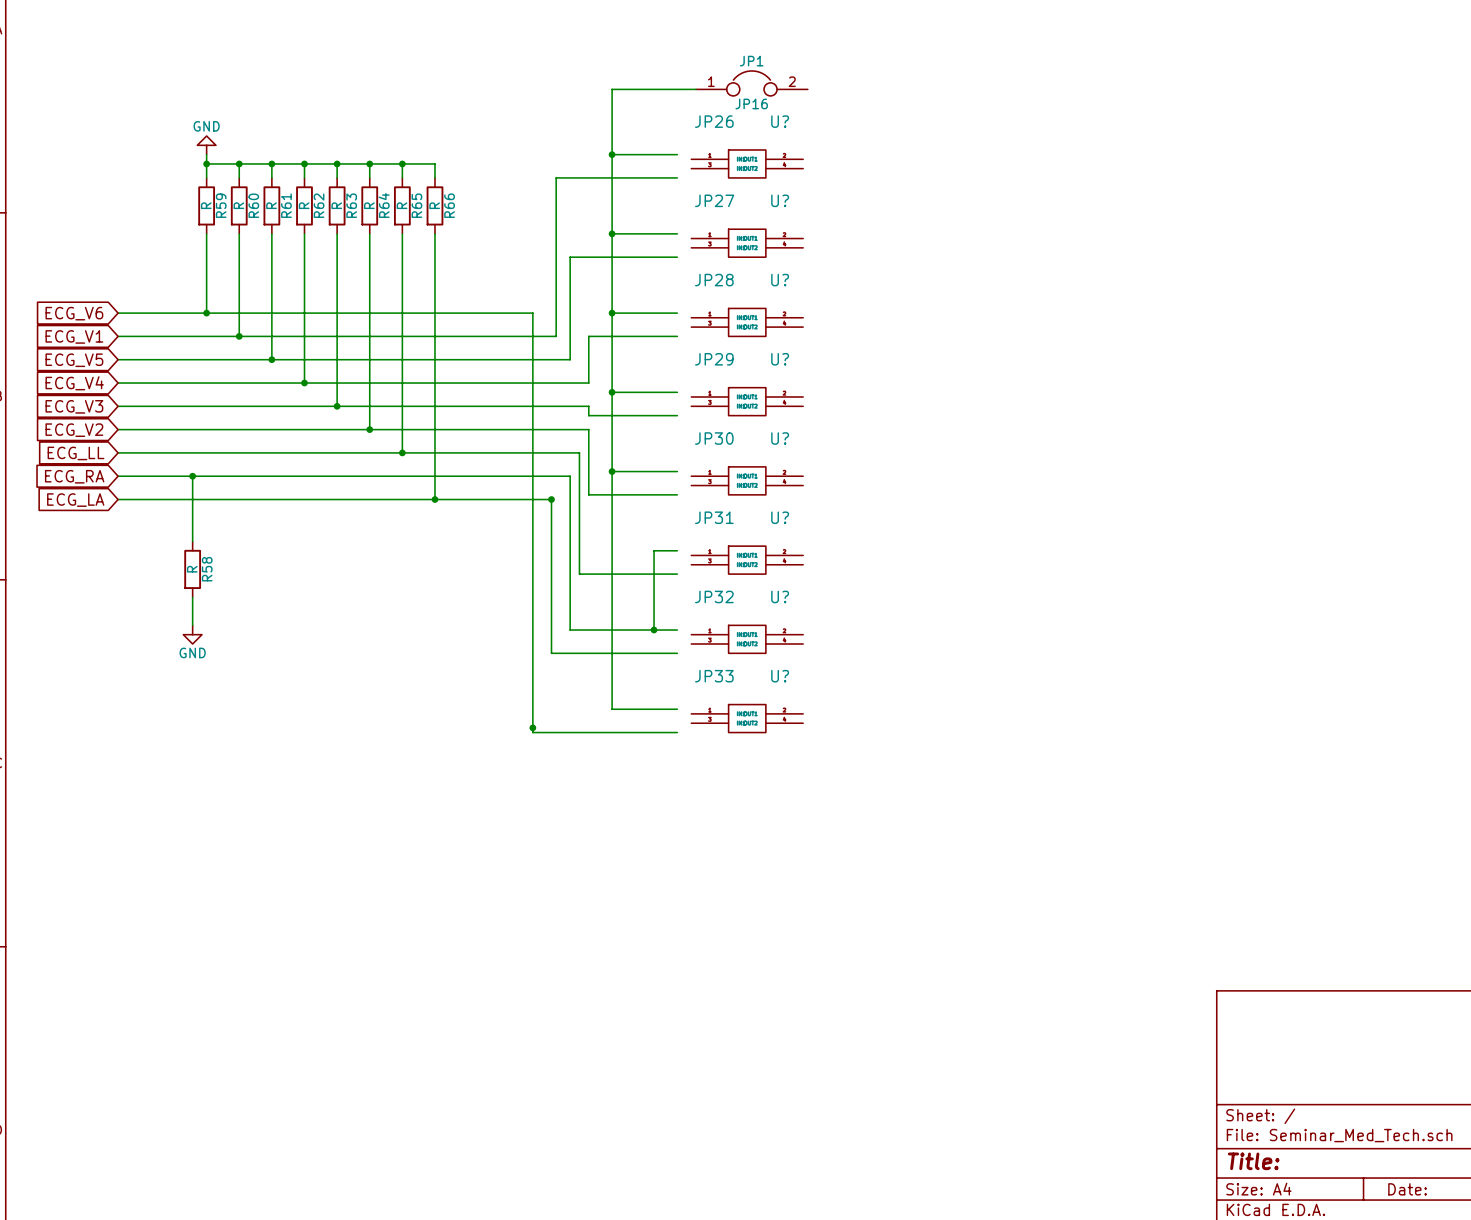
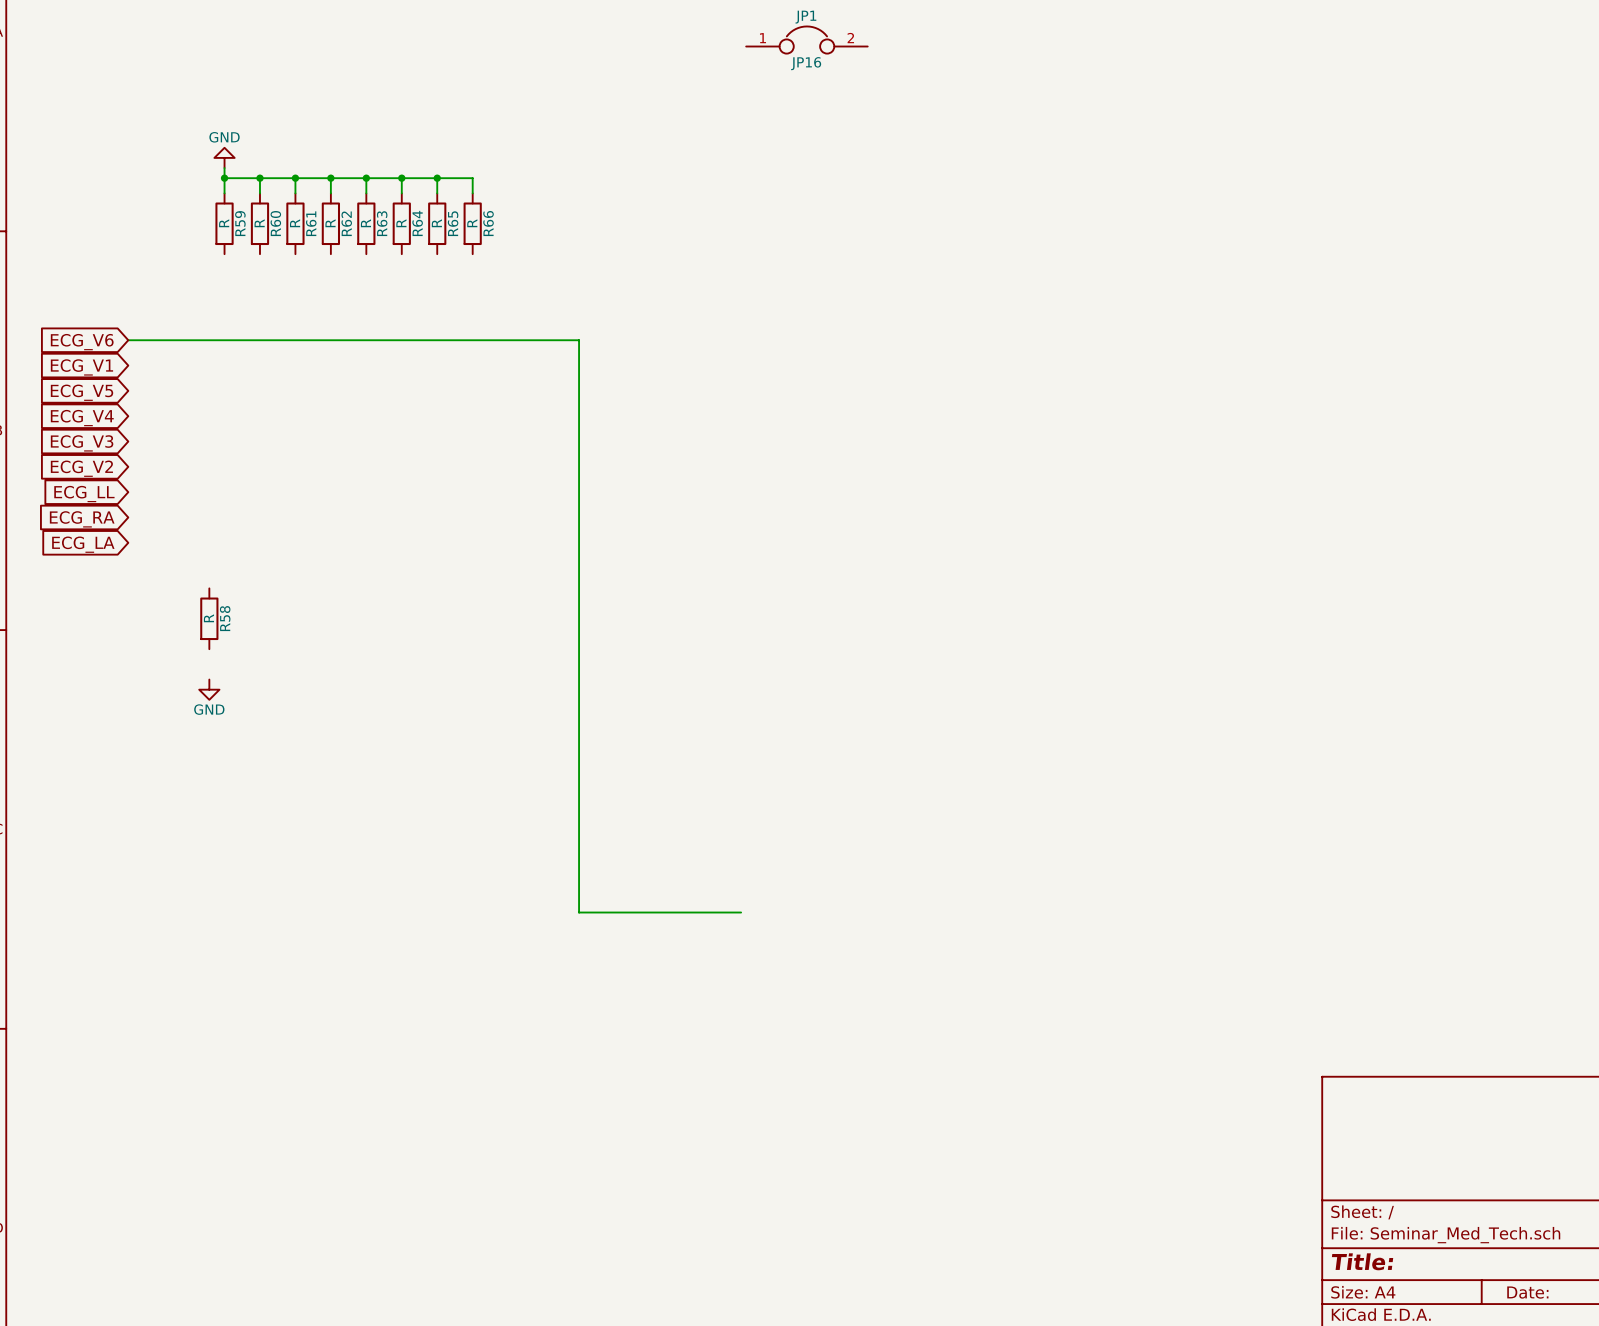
JP1 position: (751, 83) -> (806, 40)
wire: (695, 89) (612, 89) (612, 709) (677, 709) -> none
wire: (612, 154) (677, 154) -> none
junction: (612, 154) -> none
U?: JP26 (747, 163) -> none
wire: (677, 177) (556, 177) (556, 336) (118, 336) -> none
wire: (206, 233) (206, 313) -> none
wire: (239, 233) (239, 336) -> none
wire: (271, 233) (271, 359) -> none
wire: (304, 233) (304, 383) -> none
wire: (337, 233) (337, 406) -> none
wire: (369, 233) (369, 429) -> none
wire: (402, 233) (402, 452) -> none
wire: (434, 233) (434, 499) -> none
wire: (612, 233) (677, 233) -> none
junction: (612, 233) -> none
U?: JP27 (747, 243) -> none
wire: (677, 257) (570, 257) (570, 359) (118, 359) -> none
junction: (206, 313) -> none
wire: (612, 313) (677, 313) -> none
junction: (612, 313) -> none
U?: JP28 (747, 322) -> none
junction: (239, 336) -> none
wire: (677, 336) (588, 336) (588, 383) (118, 383) -> none
junction: (271, 359) -> none
junction: (304, 383) -> none
wire: (612, 392) (677, 392) -> none
junction: (612, 392) -> none
U?: JP29 (747, 401) -> none
wire: (118, 406) (588, 406) (588, 415) (677, 415) -> none
junction: (337, 406) -> none
wire: (118, 429) (588, 429) (588, 494) (677, 494) -> none
junction: (369, 429) -> none
wire: (118, 452) (579, 452) (579, 574) (677, 574) -> none
junction: (402, 452) -> none
wire: (612, 471) (677, 471) -> none
junction: (612, 471) -> none
wire: (118, 476) (570, 476) (570, 630) (677, 630) -> none
wire: (192, 476) (192, 541) -> none
junction: (192, 476) -> none
U?: JP30 (747, 480) -> none
wire: (118, 499) (551, 499) (551, 653) (677, 653) -> none
junction: (434, 499) -> none
junction: (551, 499) -> none
wire: (677, 550) (654, 550) (654, 630) -> none
U?: JP31 (747, 560) -> none
wire: (192, 597) (192, 625) -> none
junction: (654, 630) -> none
U?: JP32 (747, 639) -> none
U?: JP33 (747, 718) -> none
junction: (532, 727) -> none
wire: (532, 732) (677, 732) -> (579, 796) (579, 912) (741, 912)

